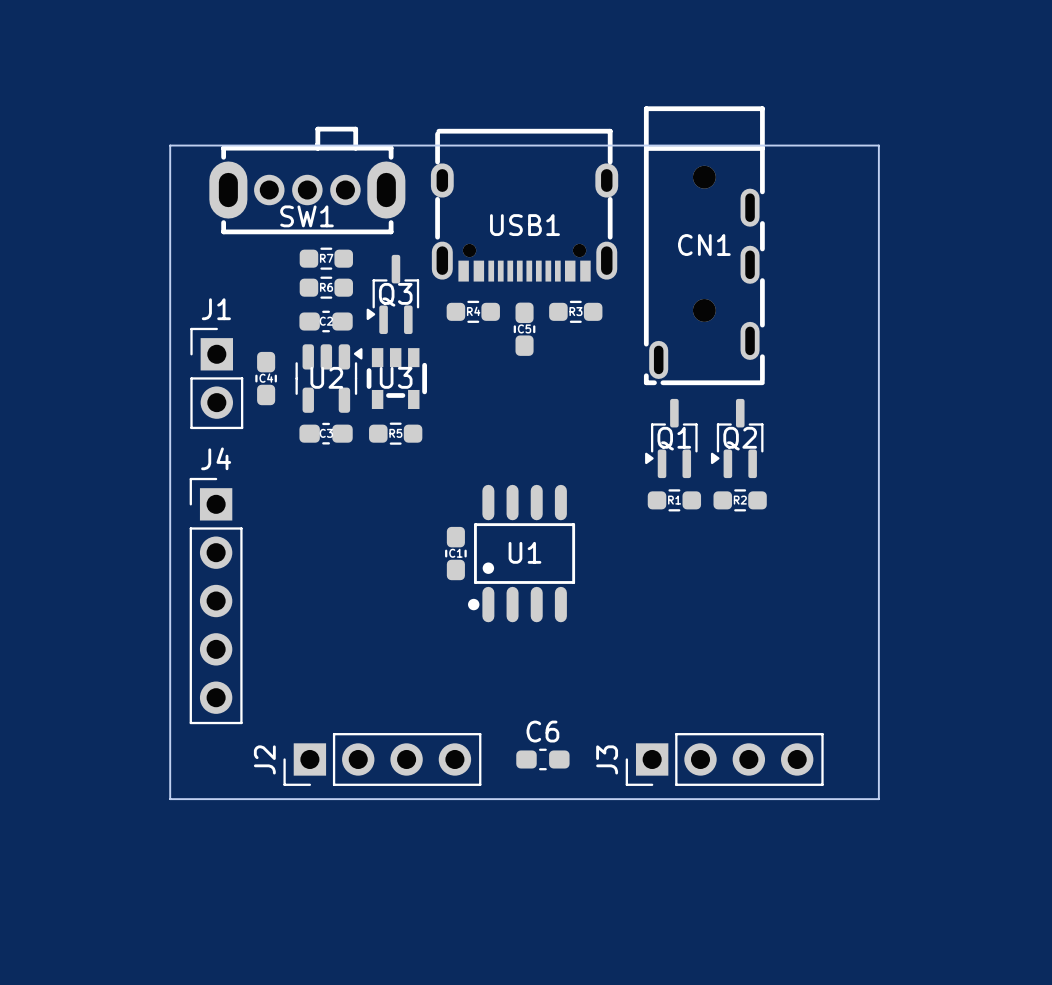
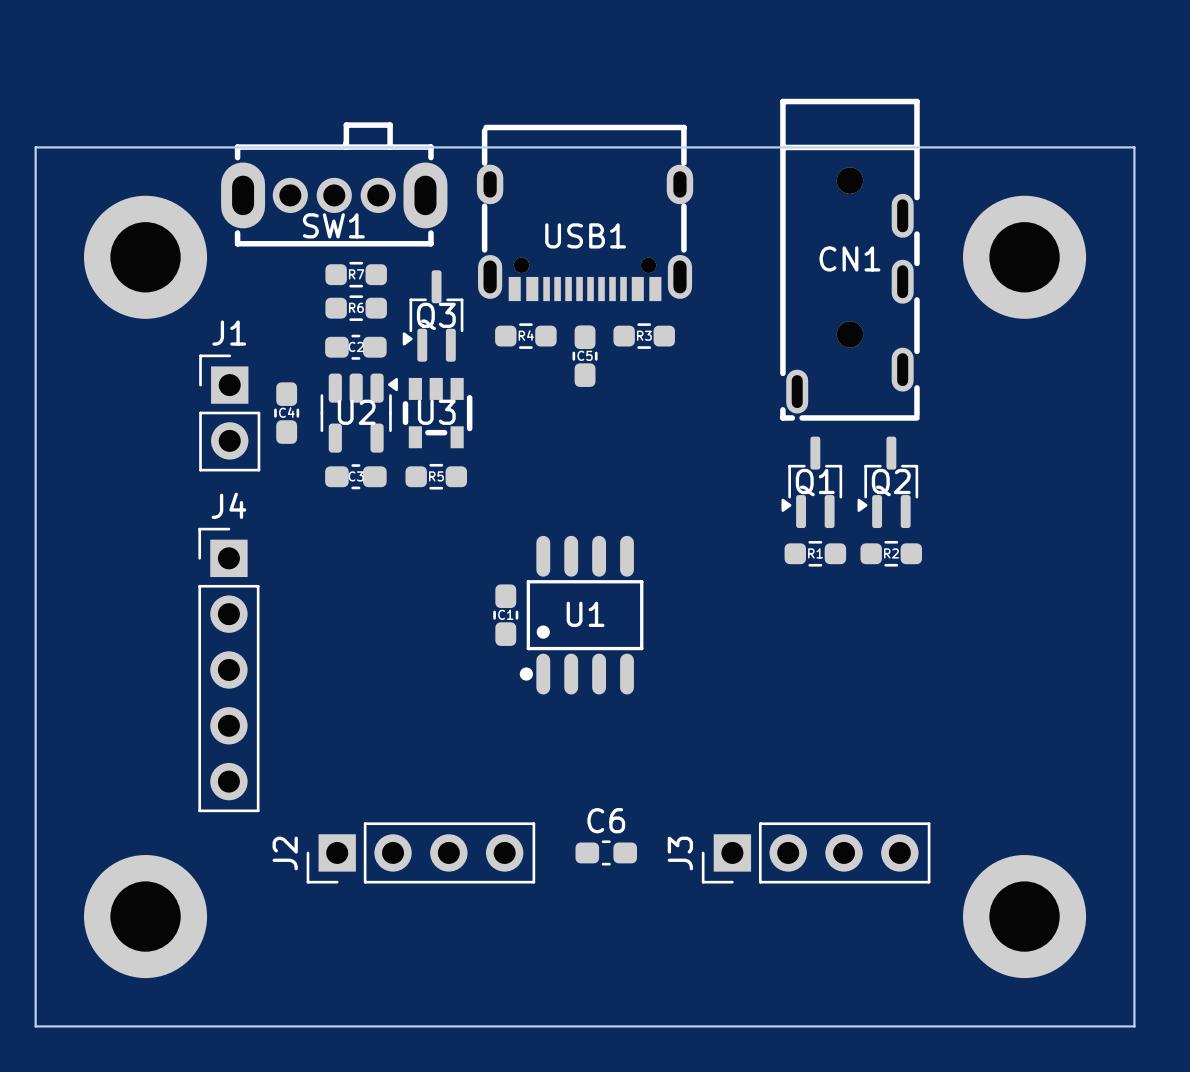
board edge: (170, 145) (878, 145) (878, 799) (170, 799) (170, 145) -> (35, 147) (35, 1026) (1134, 1026) (1134, 147) (35, 147)
part: none -> (145, 257)
part: none -> (1024, 257)
CN1 position: (704, 245) -> (849, 259)
Q1 position: (671, 438) -> (811, 482)
Q2 position: (737, 438) -> (887, 482)
R1 position: (674, 500) -> (815, 553)
R2 position: (740, 500) -> (891, 553)
part: none -> (145, 916)
part: none -> (1024, 916)

